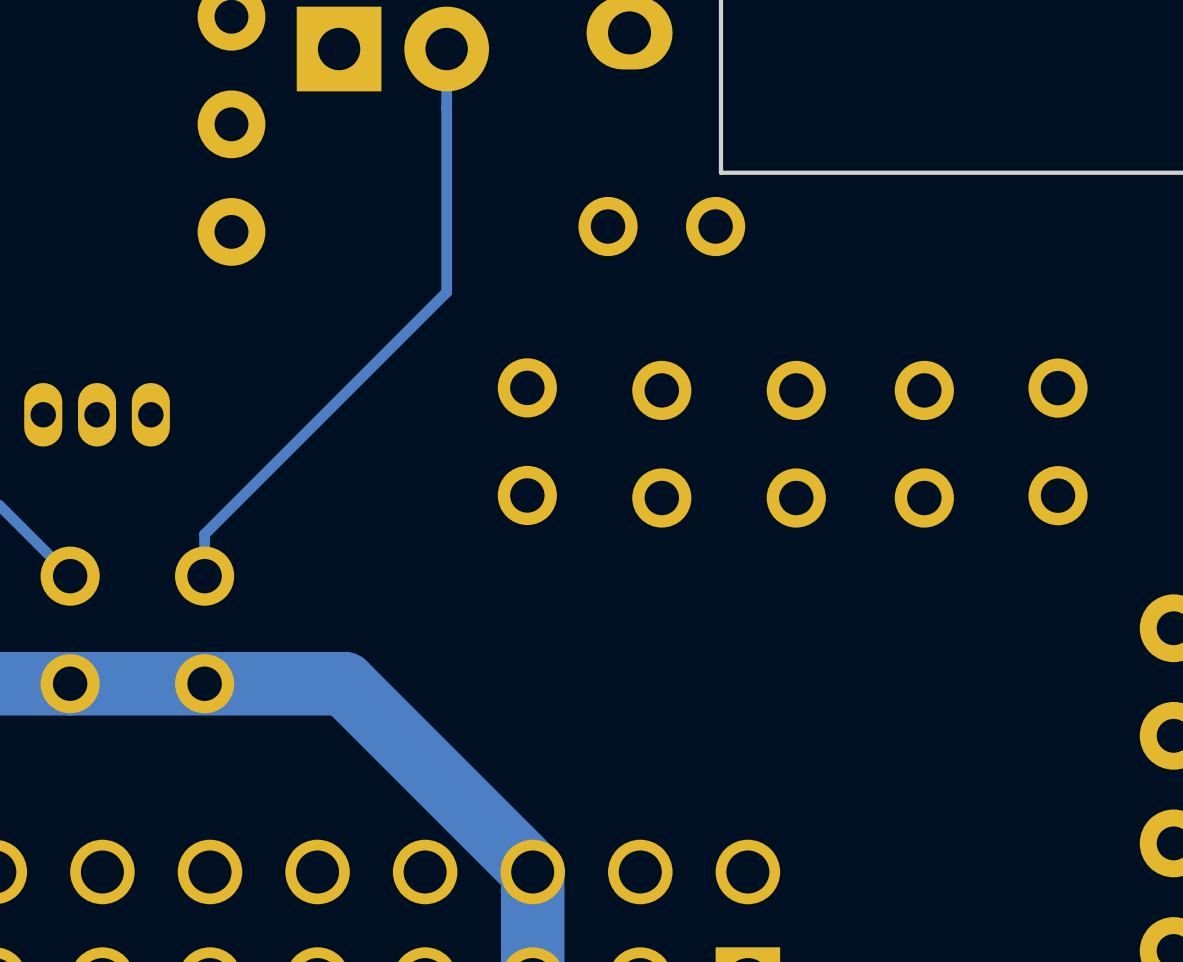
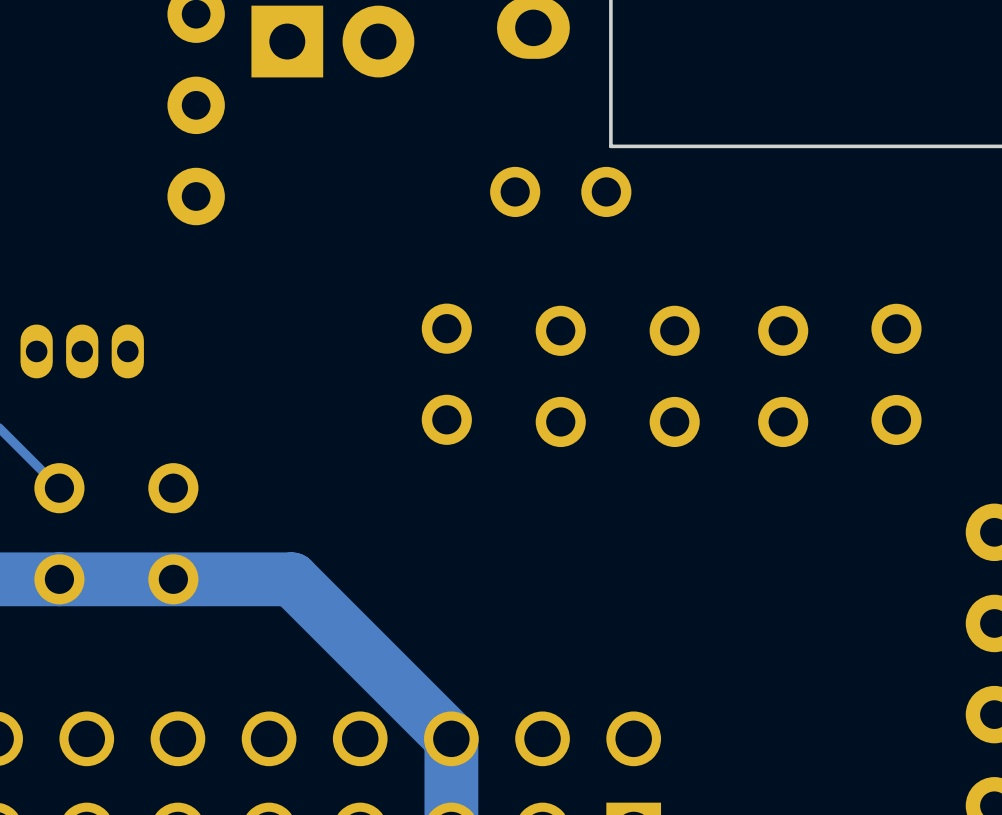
bottom track: (446, 49) (446, 292) (204, 534) (204, 576) -> none

